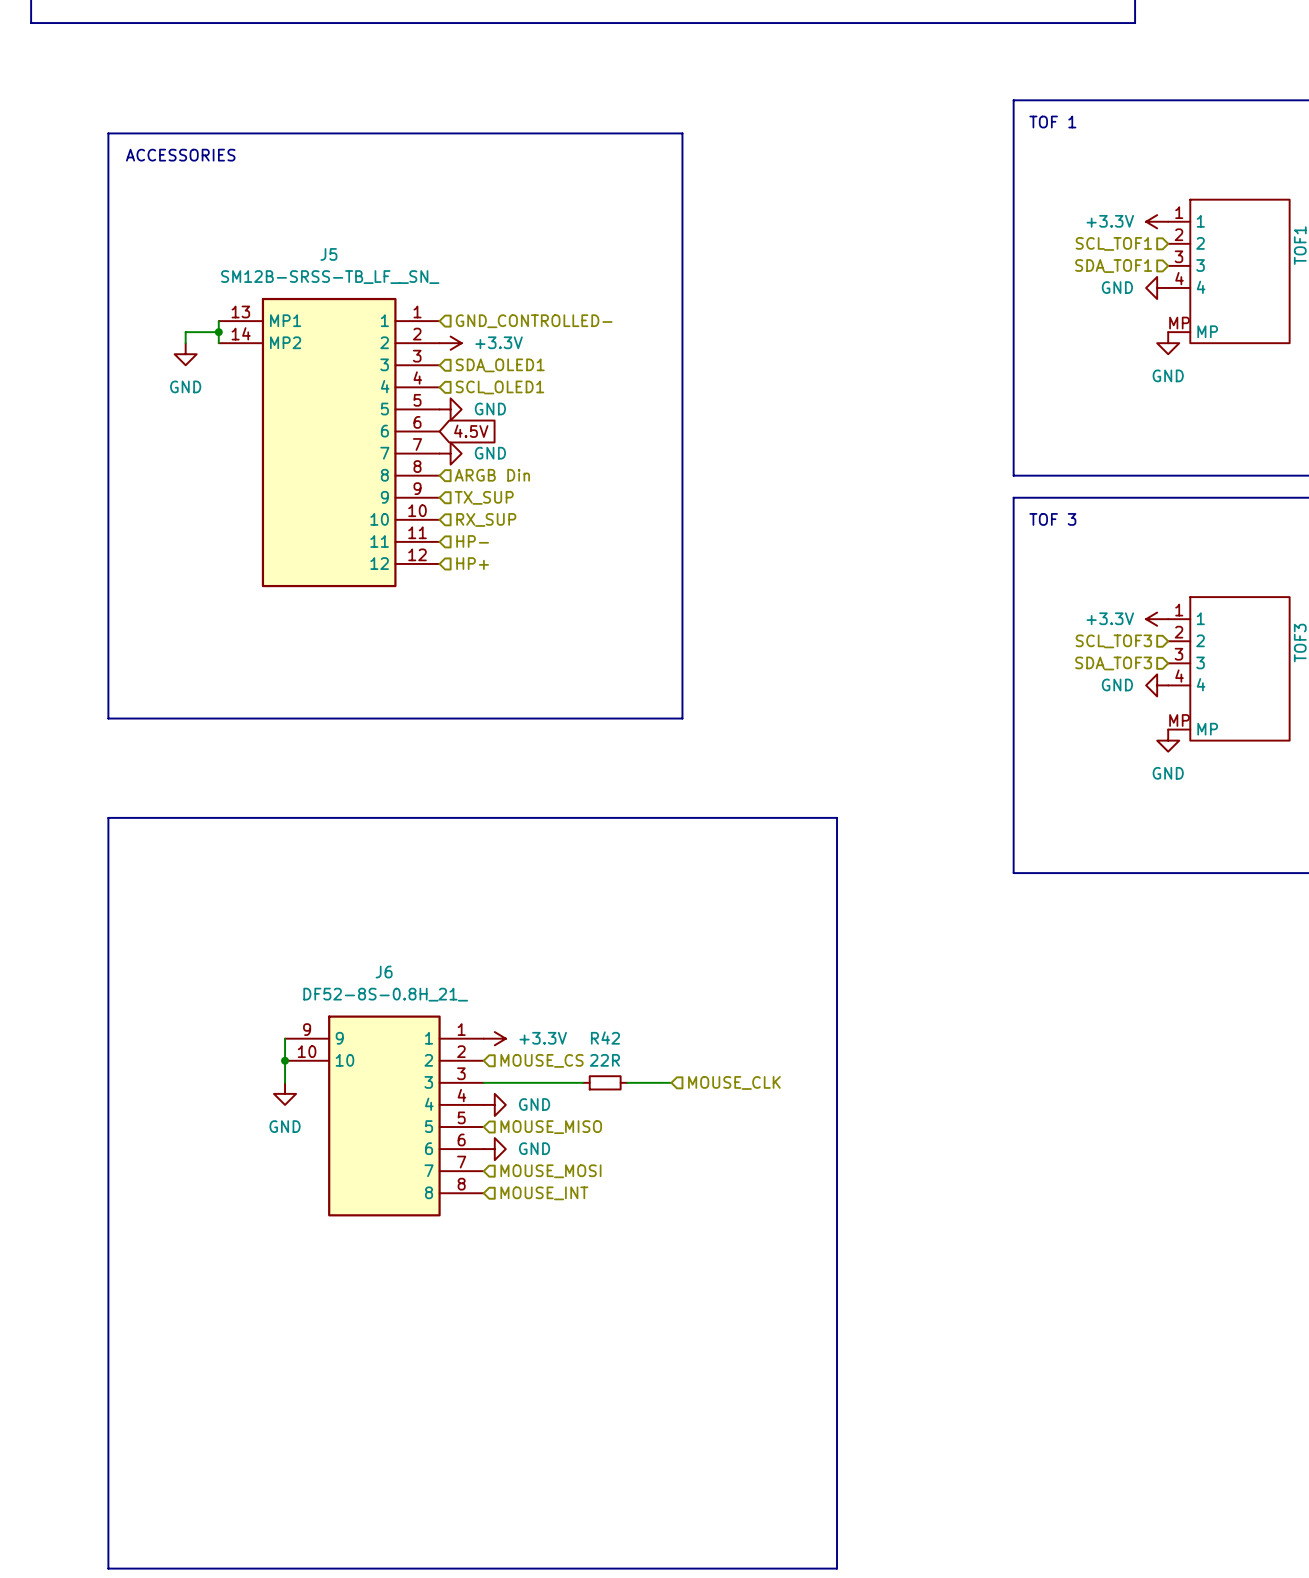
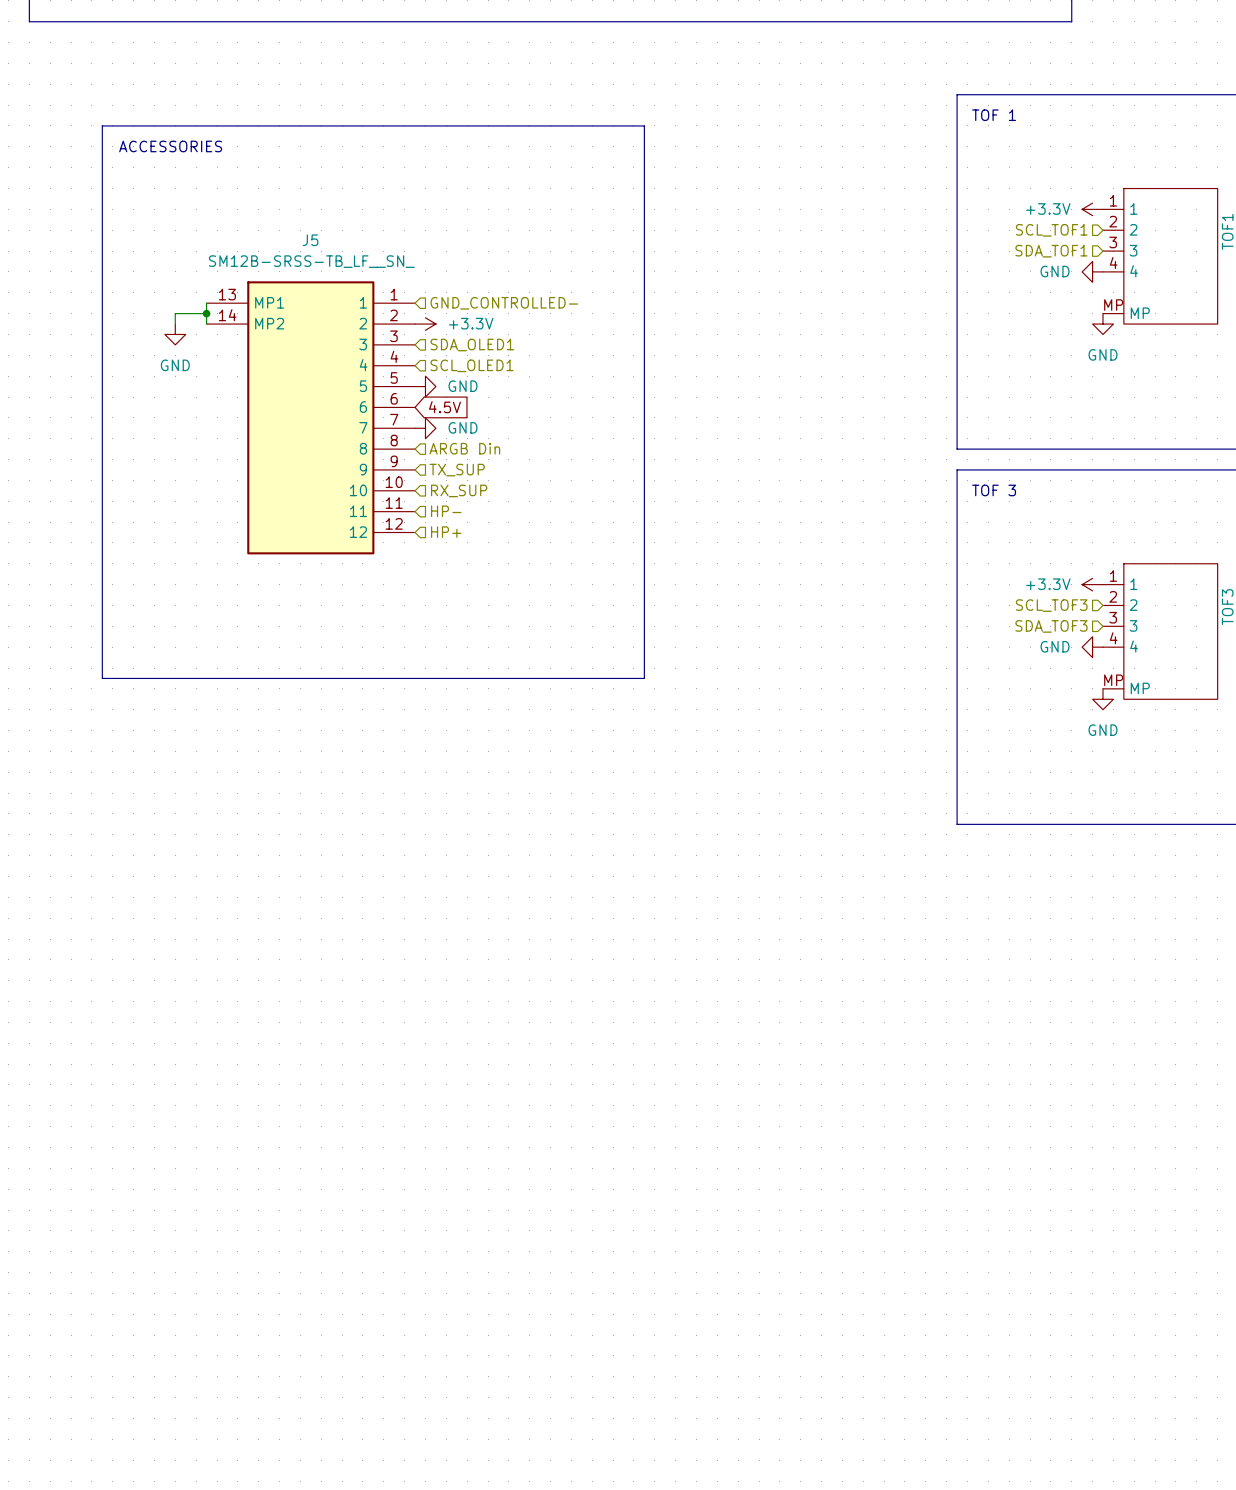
line: (108, 817) (837, 817) (837, 1568) (108, 1568) (108, 817) -> none
wire: (285, 1038) (285, 1082) -> none
power symbol: +3.3V (494, 1038) -> none
junction: (285, 1060) -> none
hierarchical label: MOUSE_CS (542, 1060) -> none
wire: (483, 1082) (583, 1082) -> none
R42: 22R (605, 1082) -> none
wire: (627, 1082) (671, 1082) -> none
hierarchical label: MOUSE_CLK (734, 1082) -> none
power symbol: GND (285, 1093) -> none
power symbol: GND (494, 1104) -> none
J6: DF52-8S-0.8H_21_ (384, 1115) -> none
hierarchical label: MOUSE_MISO (551, 1127) -> none
power symbol: GND (494, 1149) -> none
hierarchical label: MOUSE_MOSI (550, 1171) -> none
hierarchical label: MOUSE_INT (544, 1193) -> none

